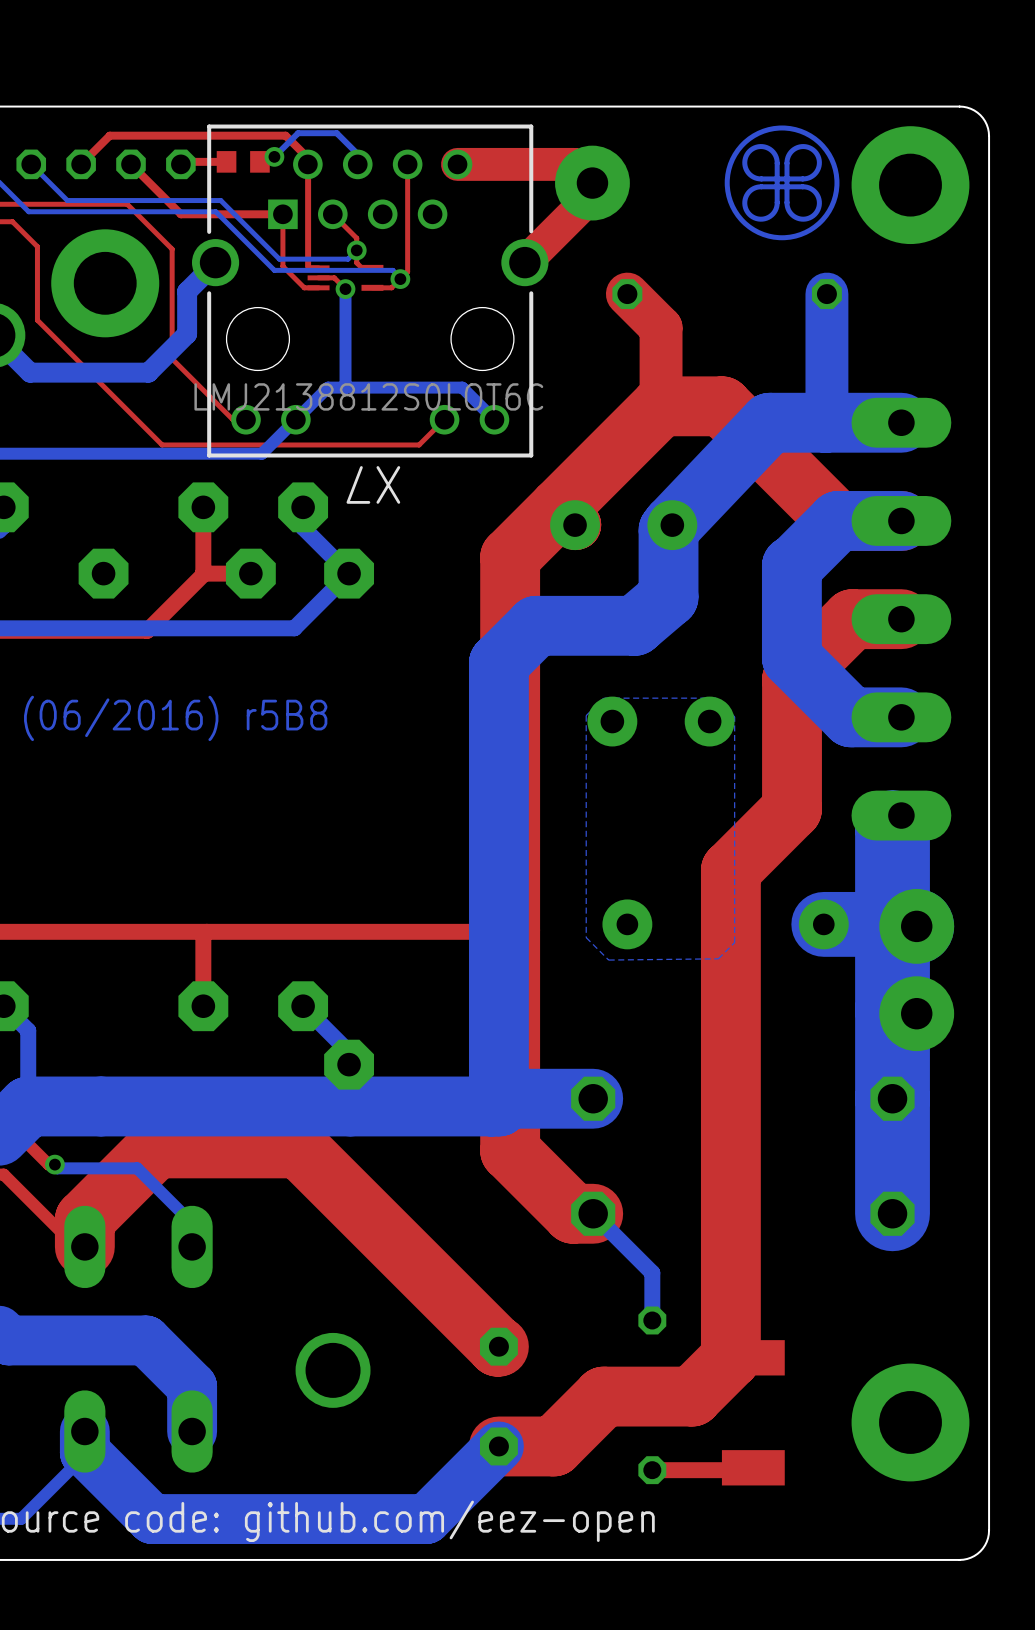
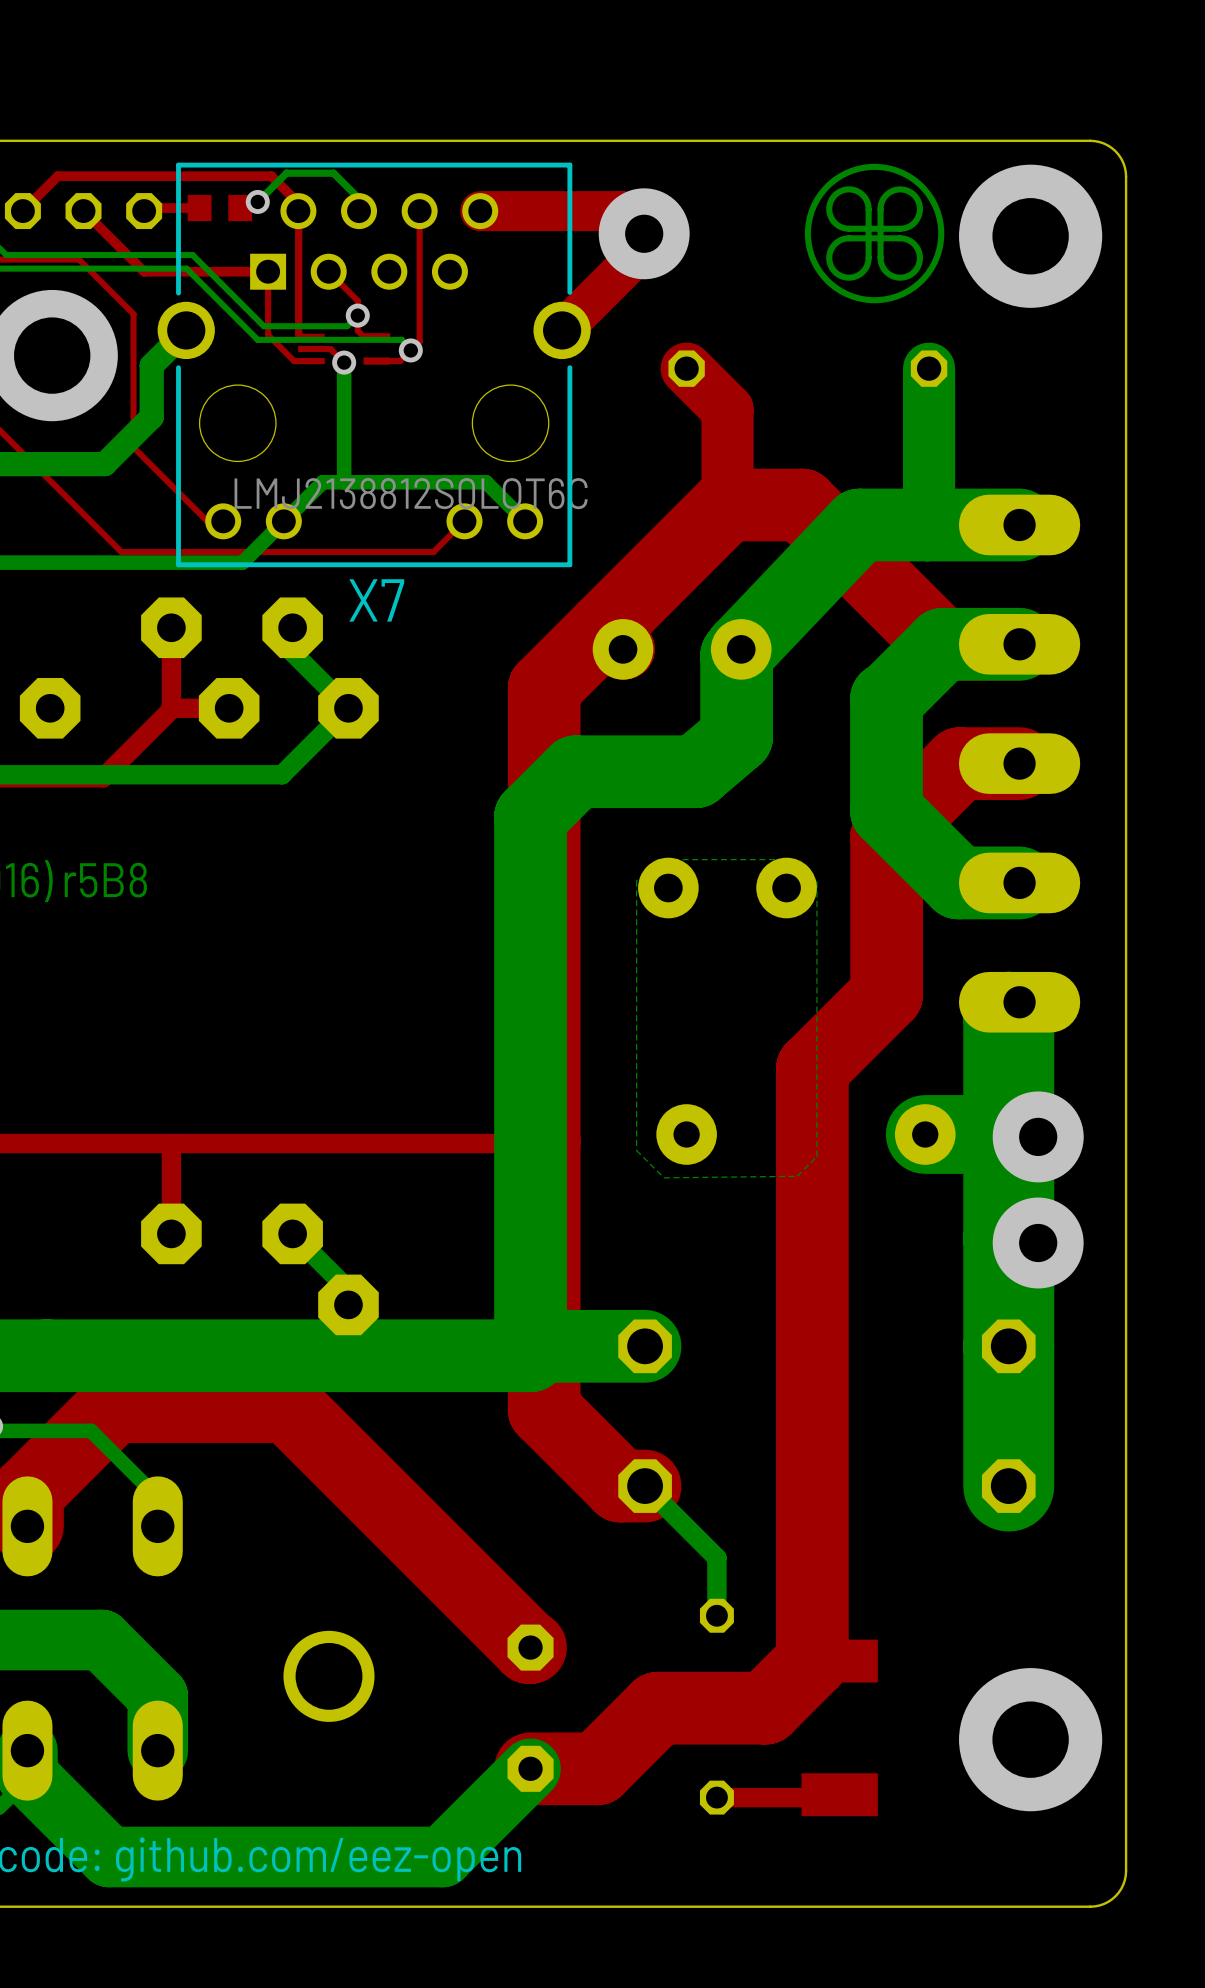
X7 name rotation: 0° (373, 484) -> 180° (376, 600)

